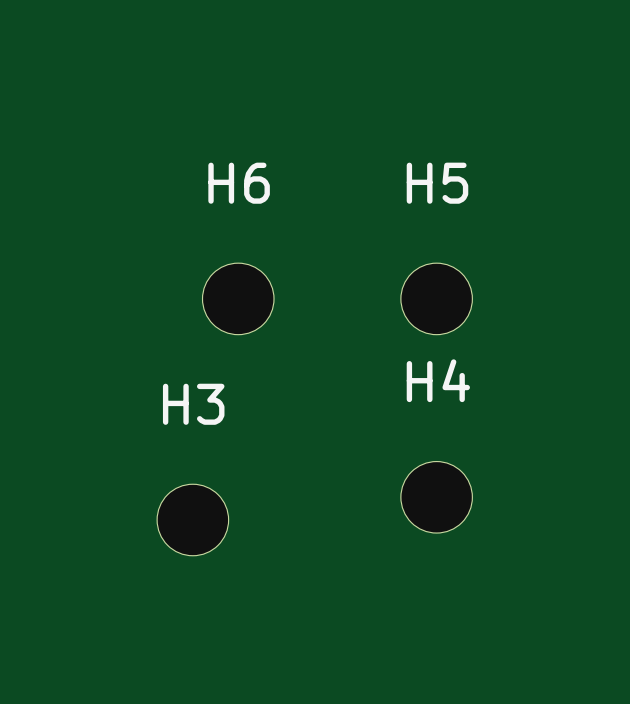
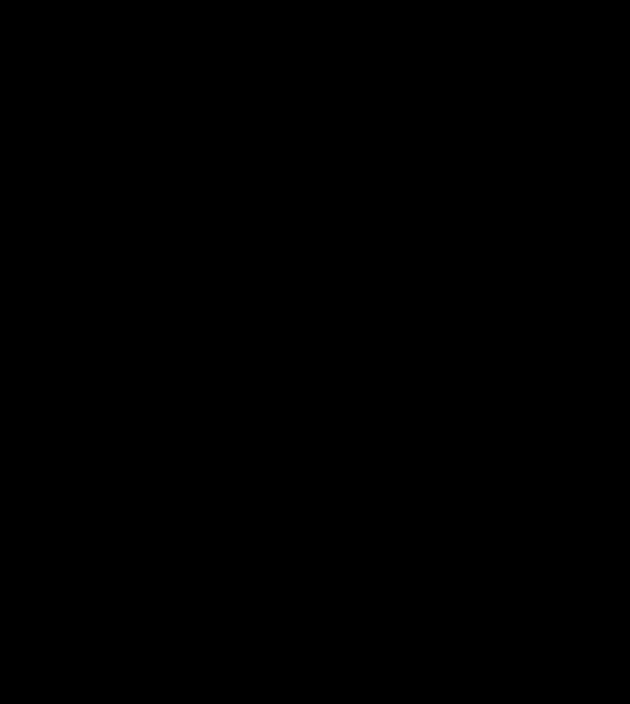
H6: (238, 298) -> none
H5: (436, 298) -> none
H4: (436, 497) -> none
H3: (192, 519) -> none

